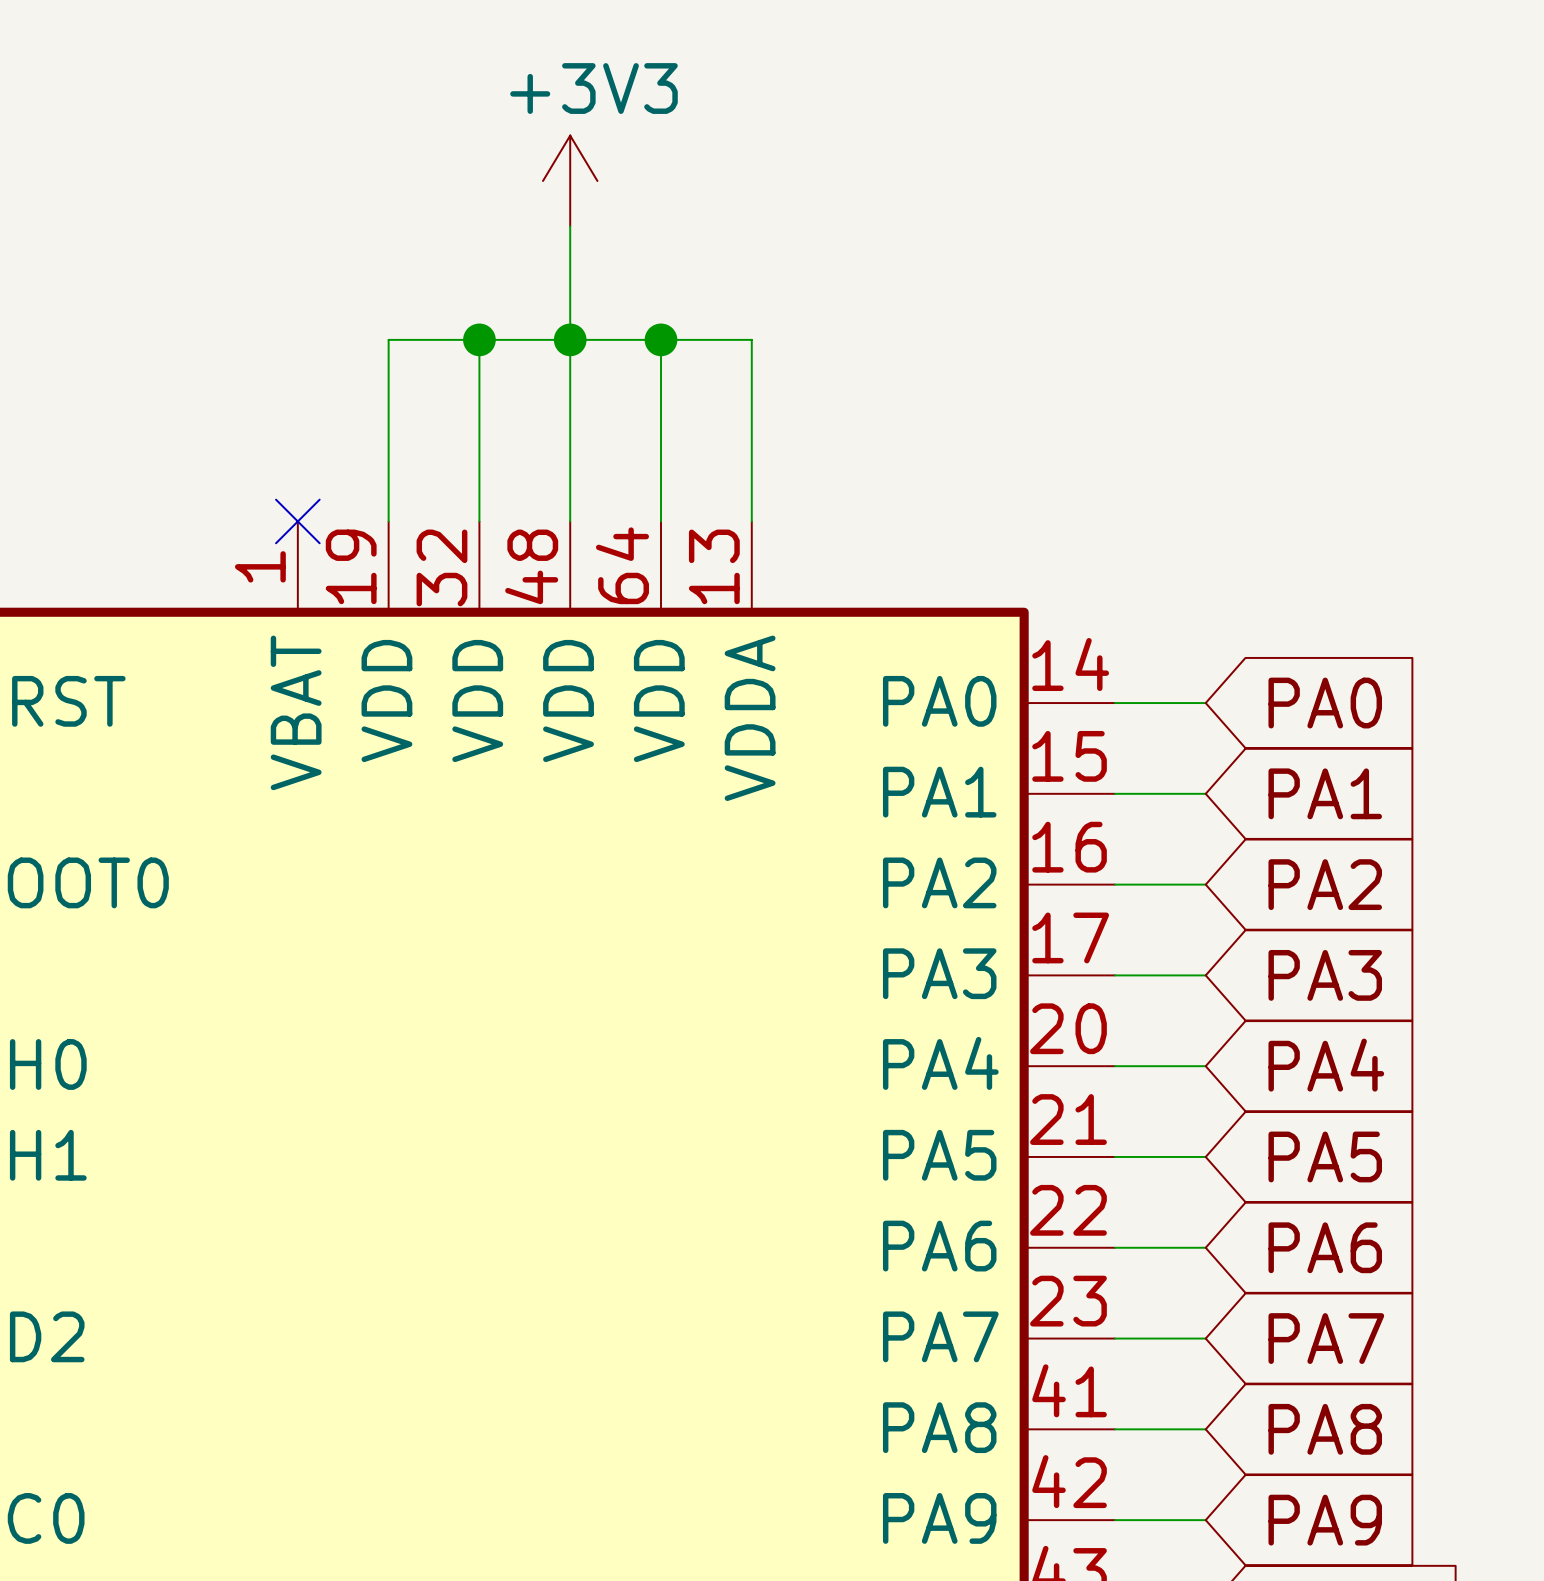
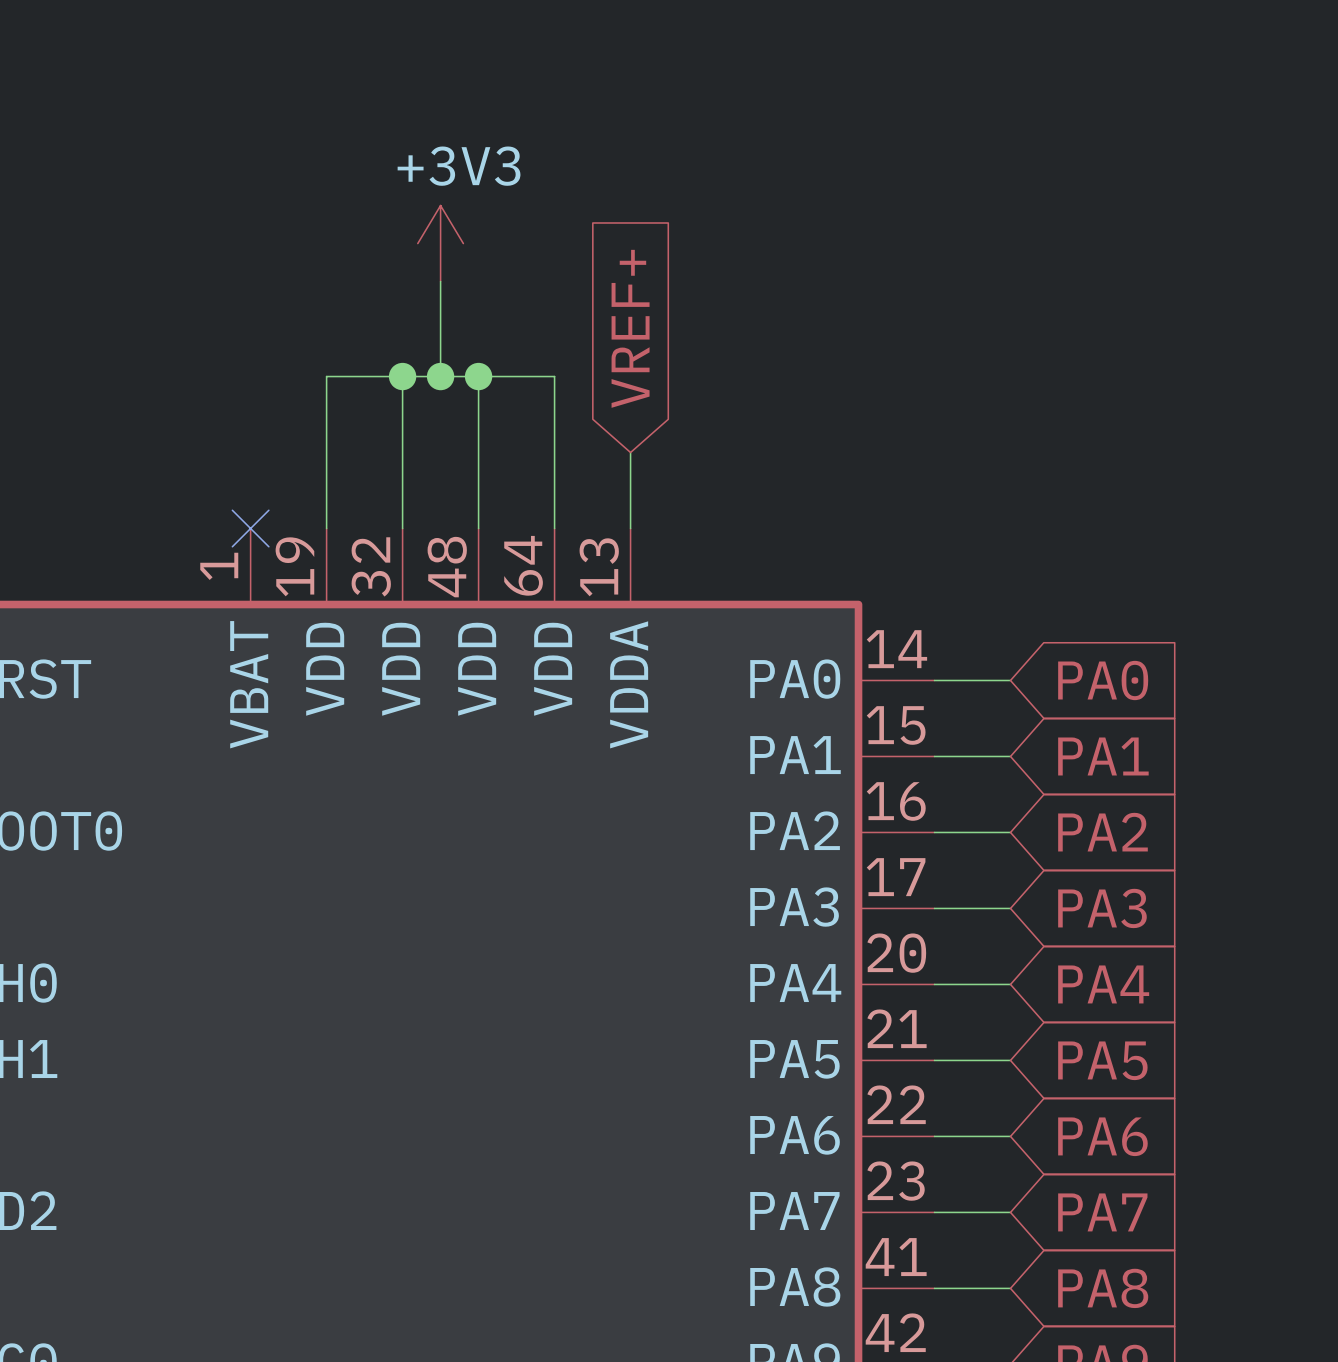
power symbol position: +3V3 (570, 181) -> +3V3 (440, 243)
wire: (570, 226) (570, 339) -> (440, 281) (440, 376)
global label: none -> VREF+ (630, 328)
wire: (661, 339) (751, 339) (751, 430) -> none
junction position: (661, 339) -> (440, 376)

